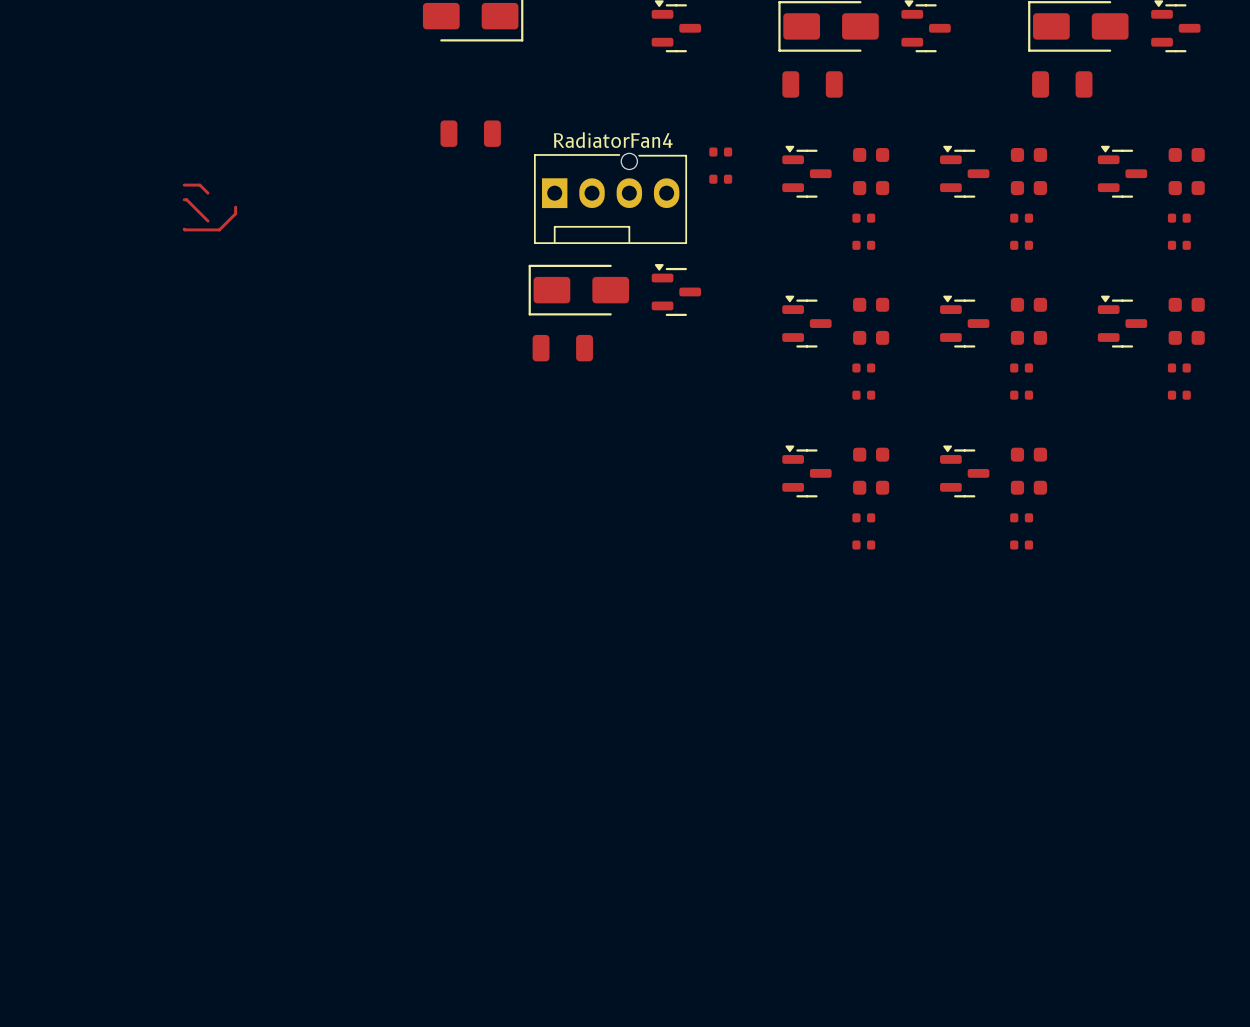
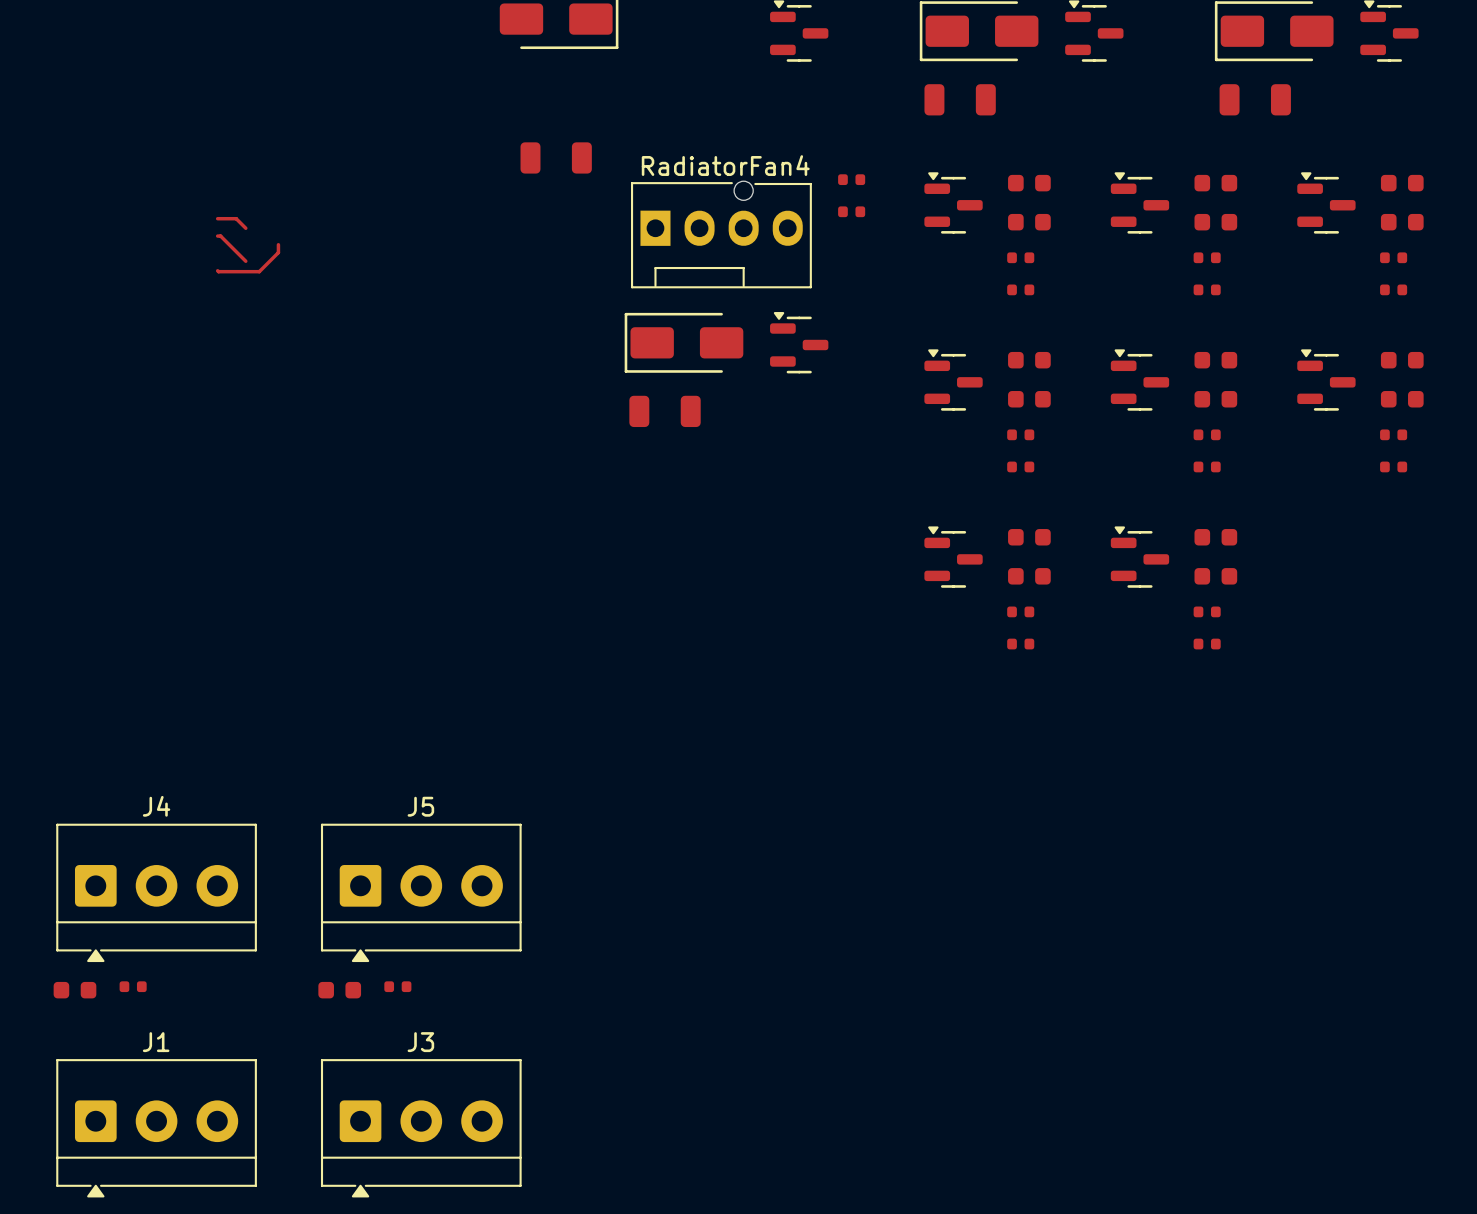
J4: none -> (156, 892)
J5: none -> (421, 892)
part: none -> (133, 986)
part: none -> (397, 986)
part: none -> (74, 990)
part: none -> (339, 990)
J1: none -> (156, 1128)
J3: none -> (421, 1128)

